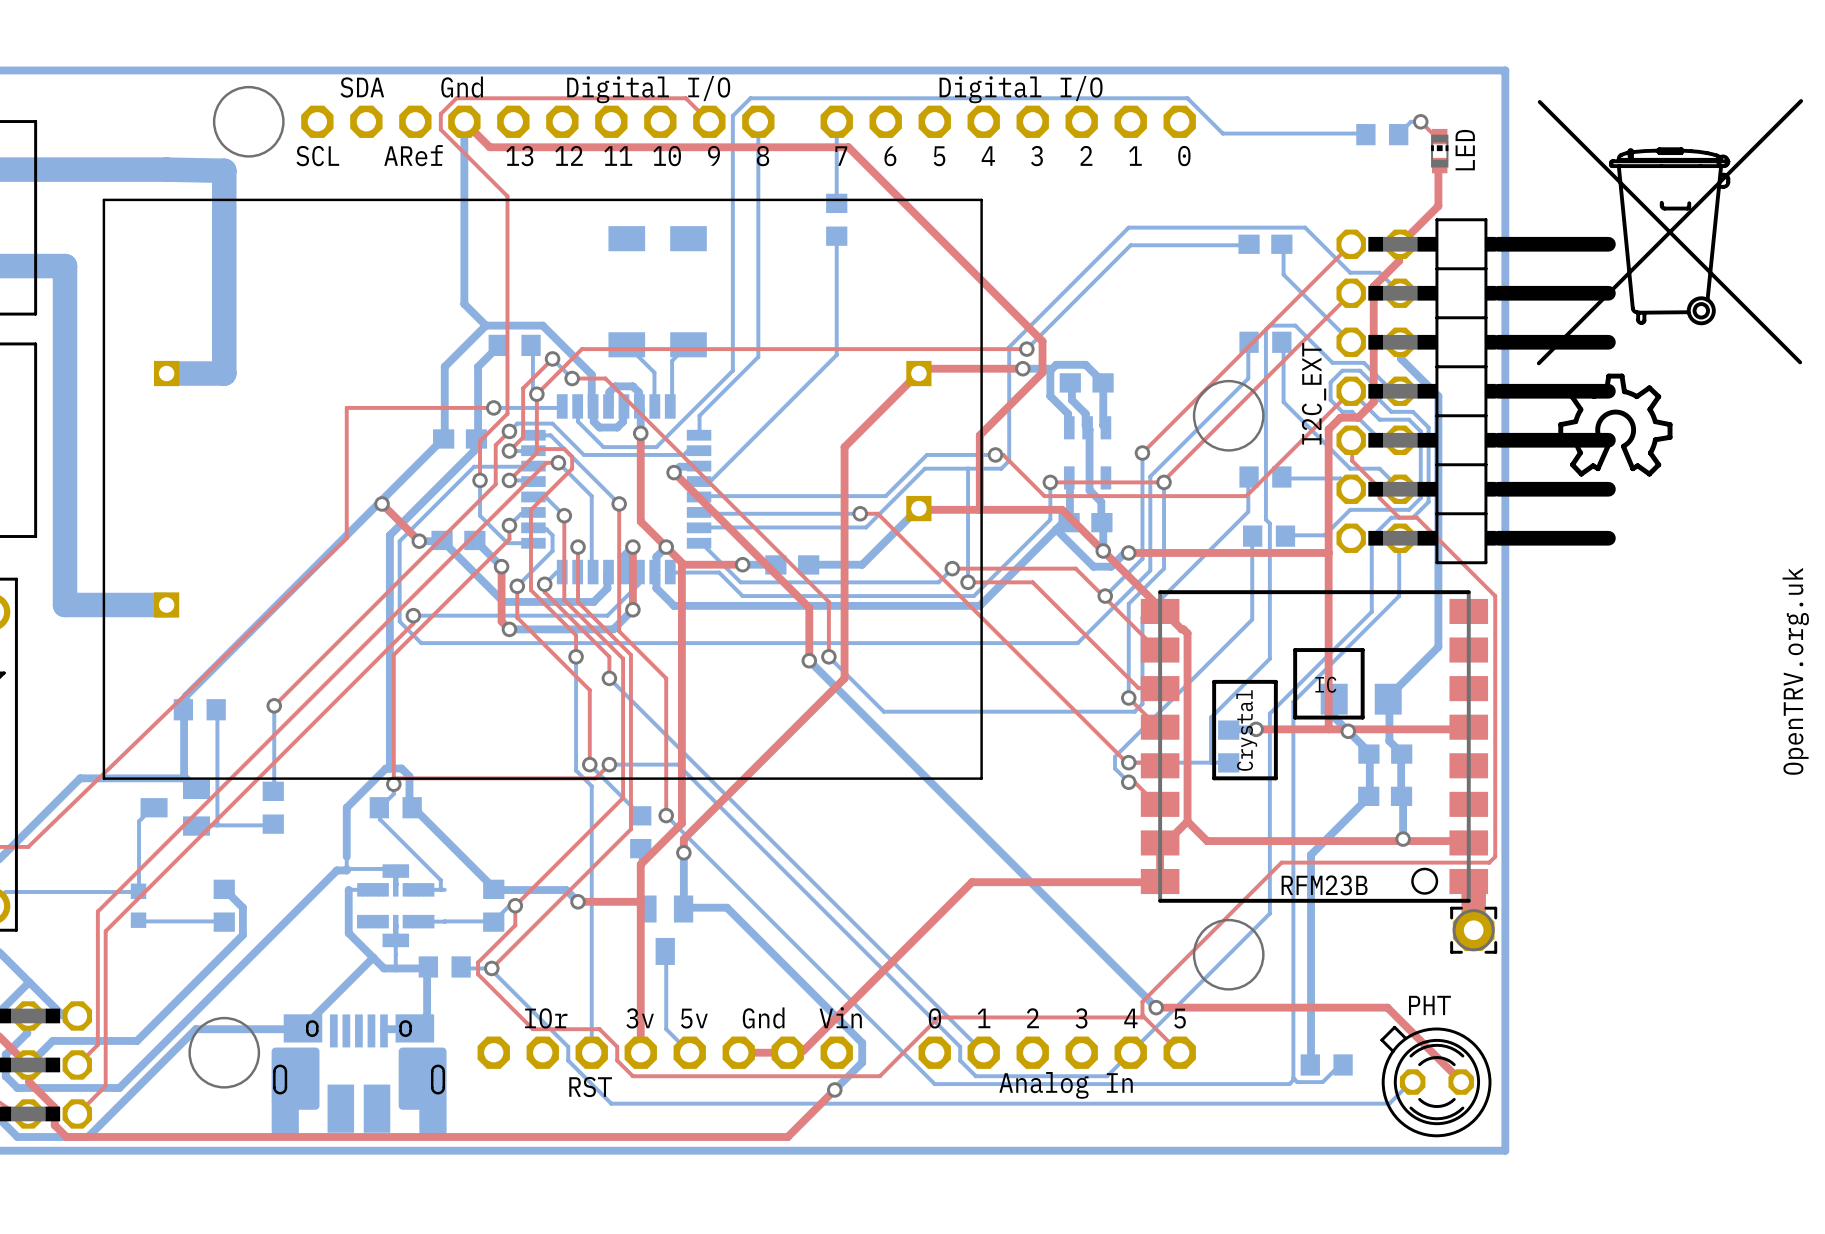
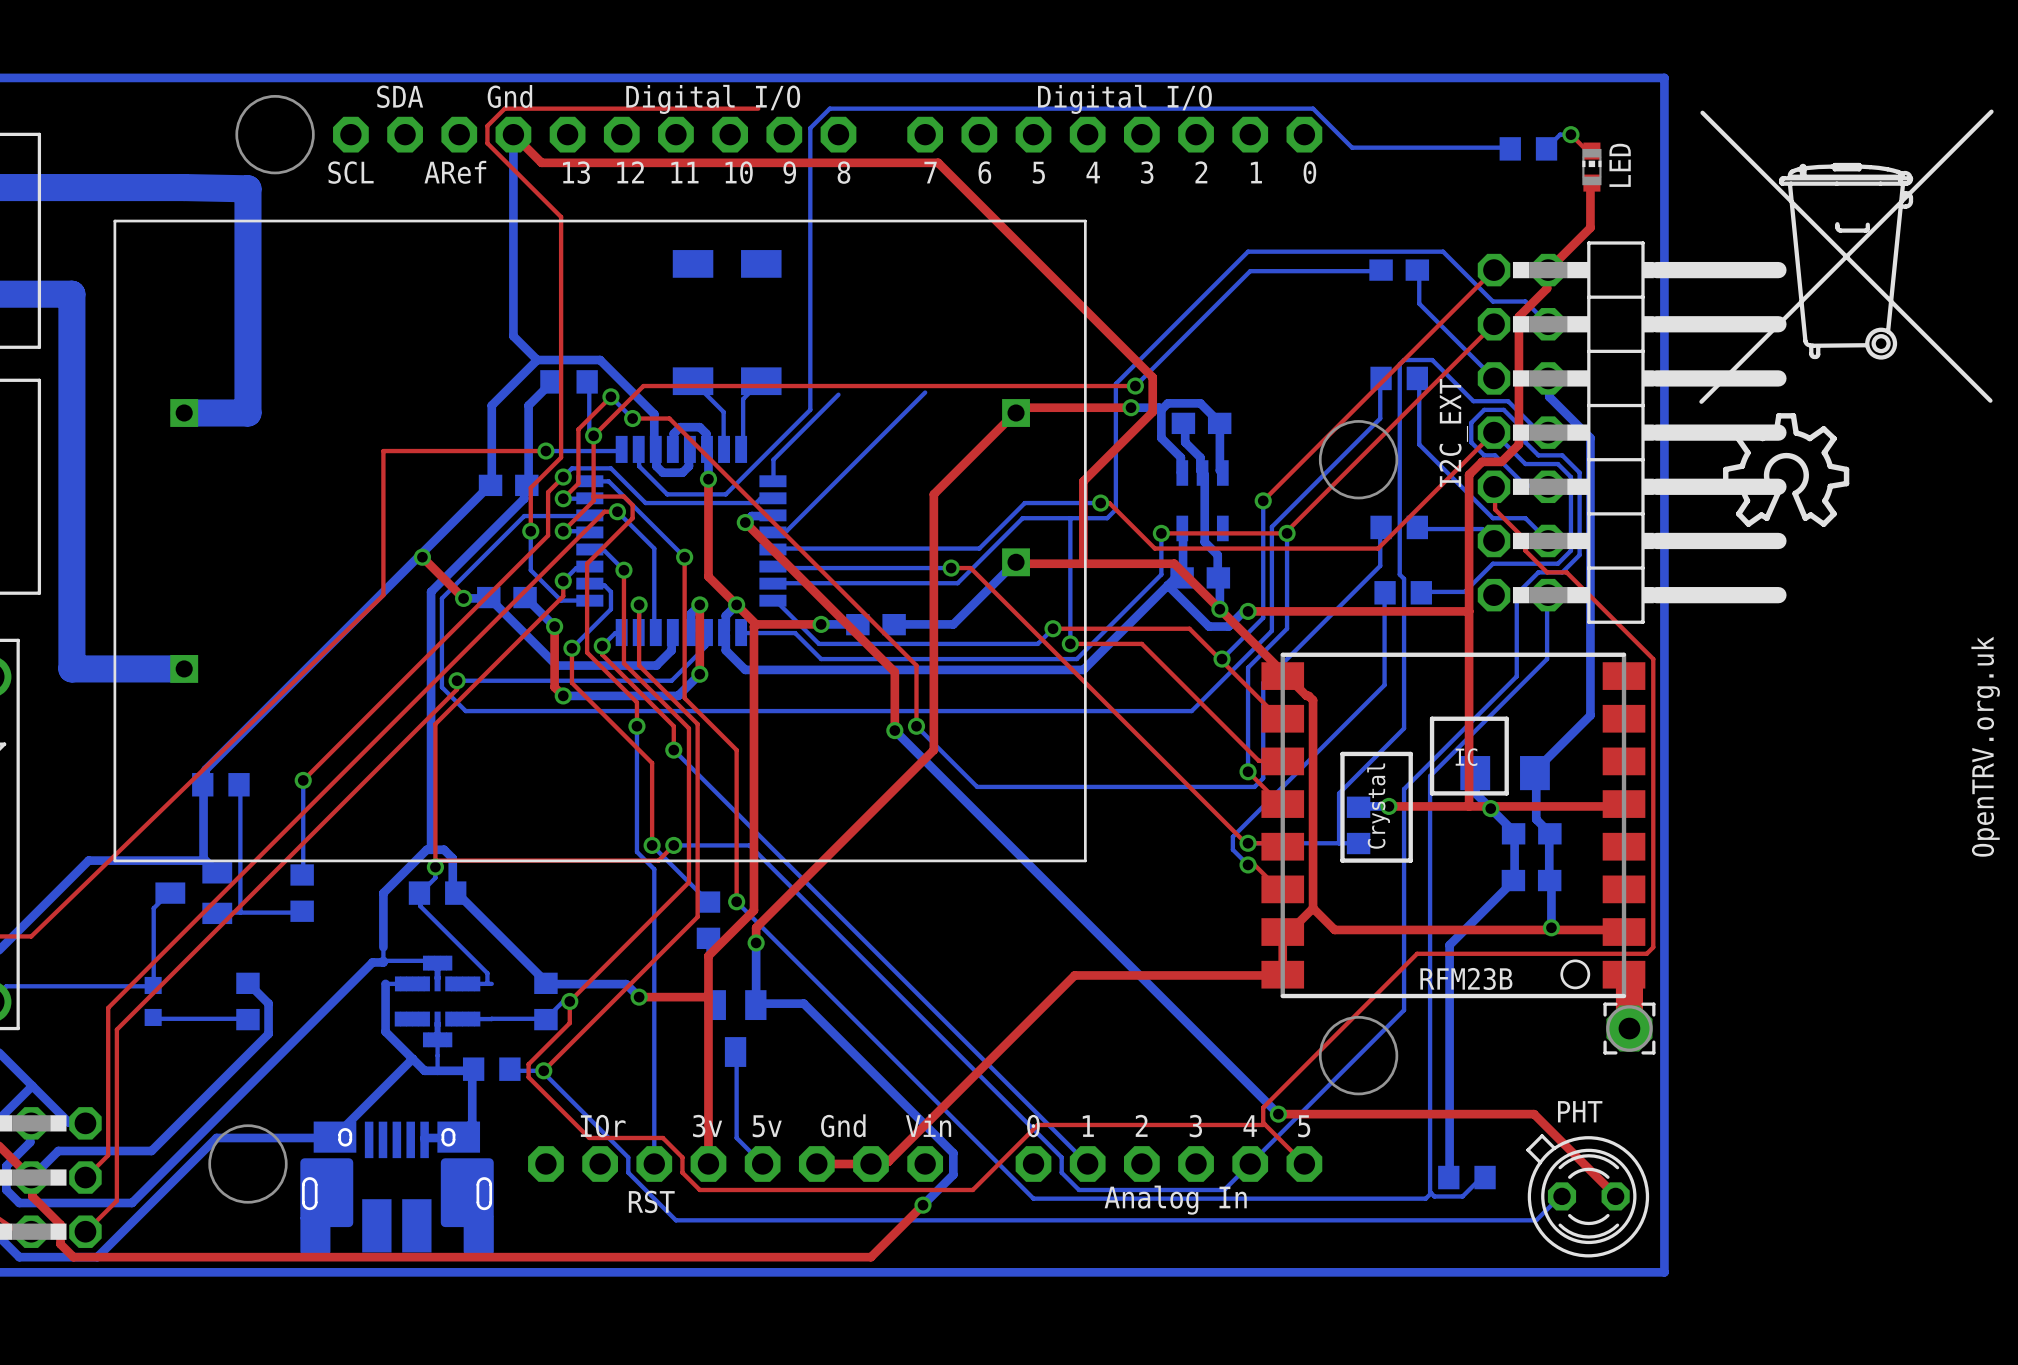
top track: (685, 98) (709, 121) -> none
bottom track: (758, 121) (758, 356) -> none
bottom track: (836, 121) (836, 203) -> none
part: (836, 219) -> none
bottom track: (836, 236) (836, 355) -> none

